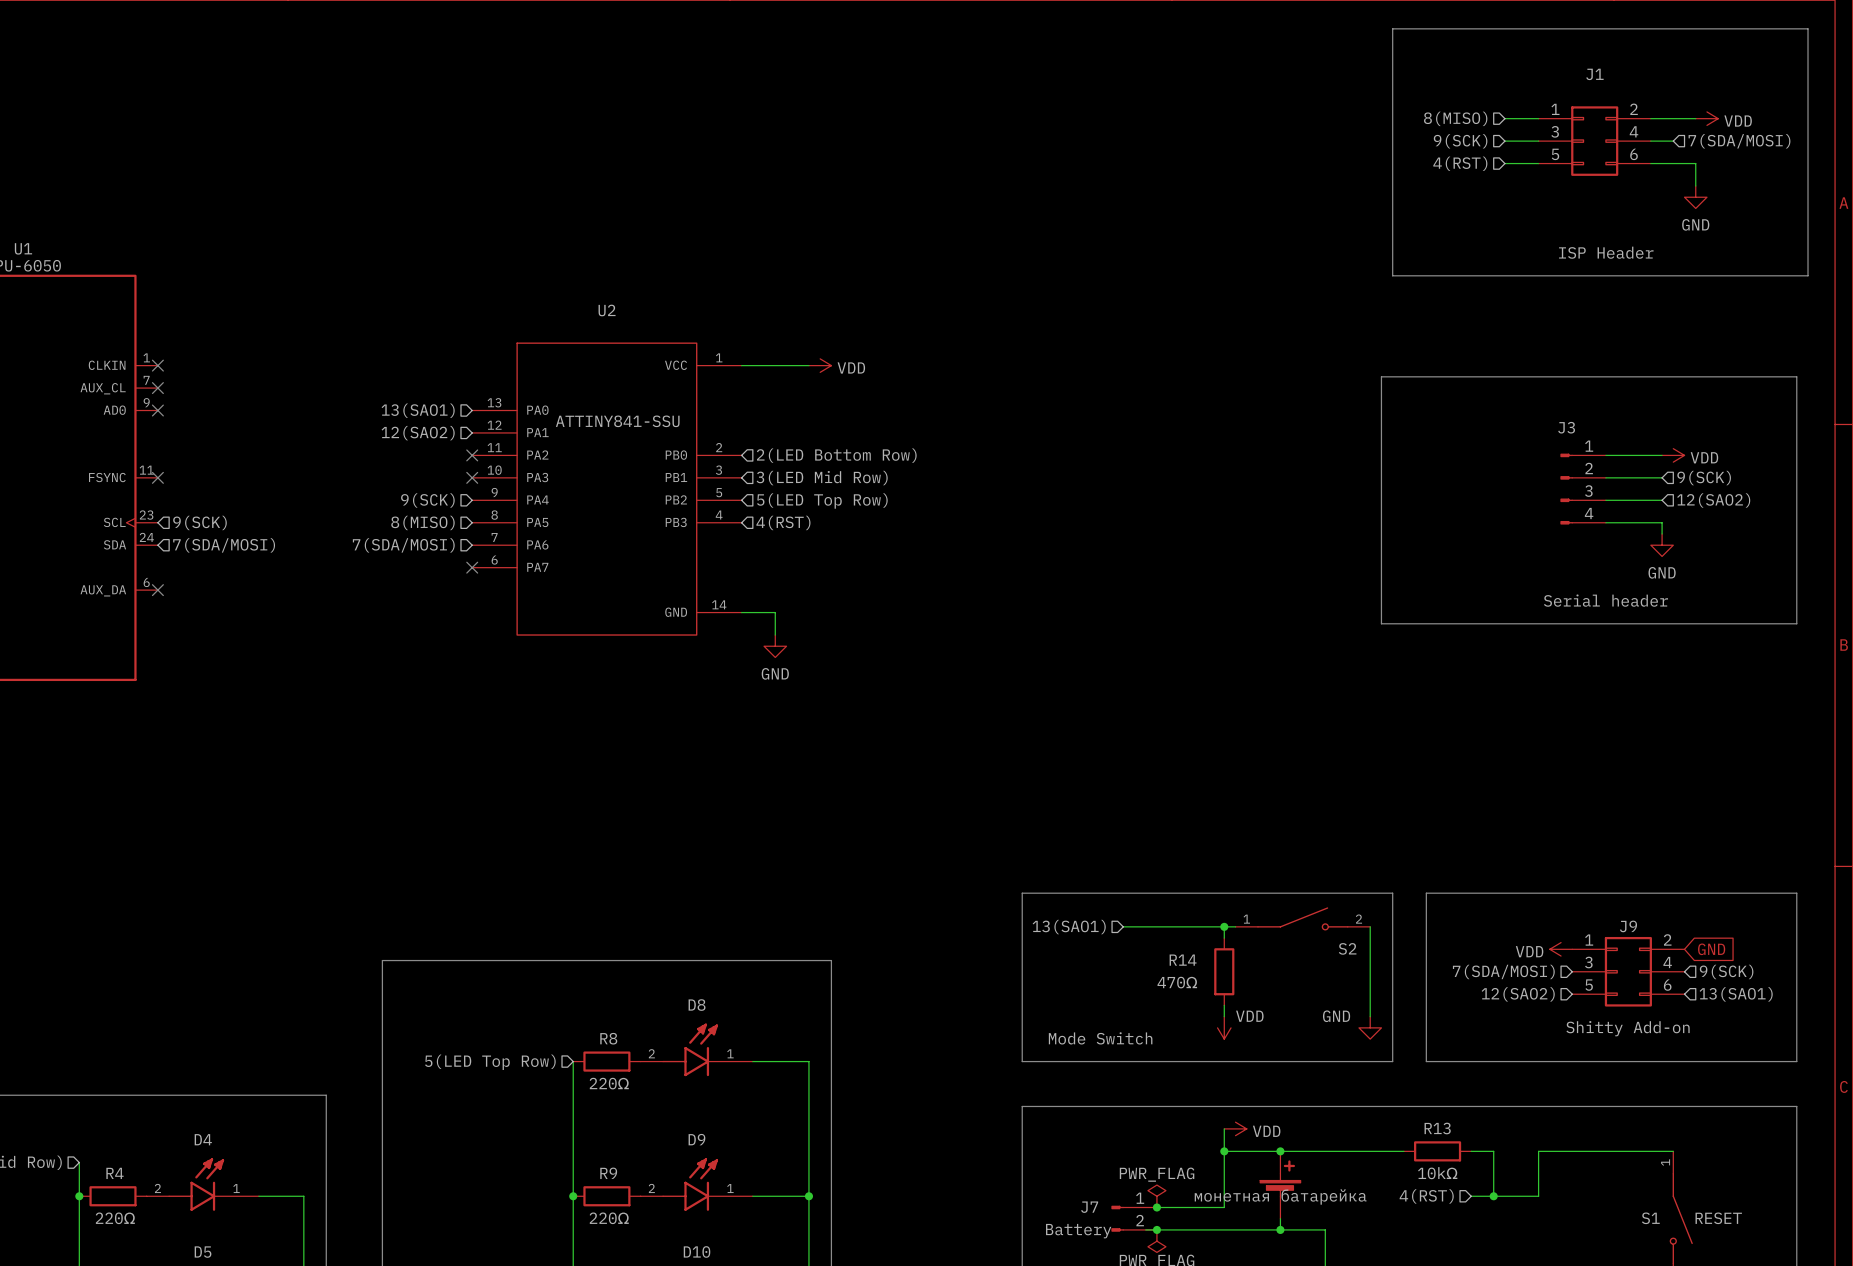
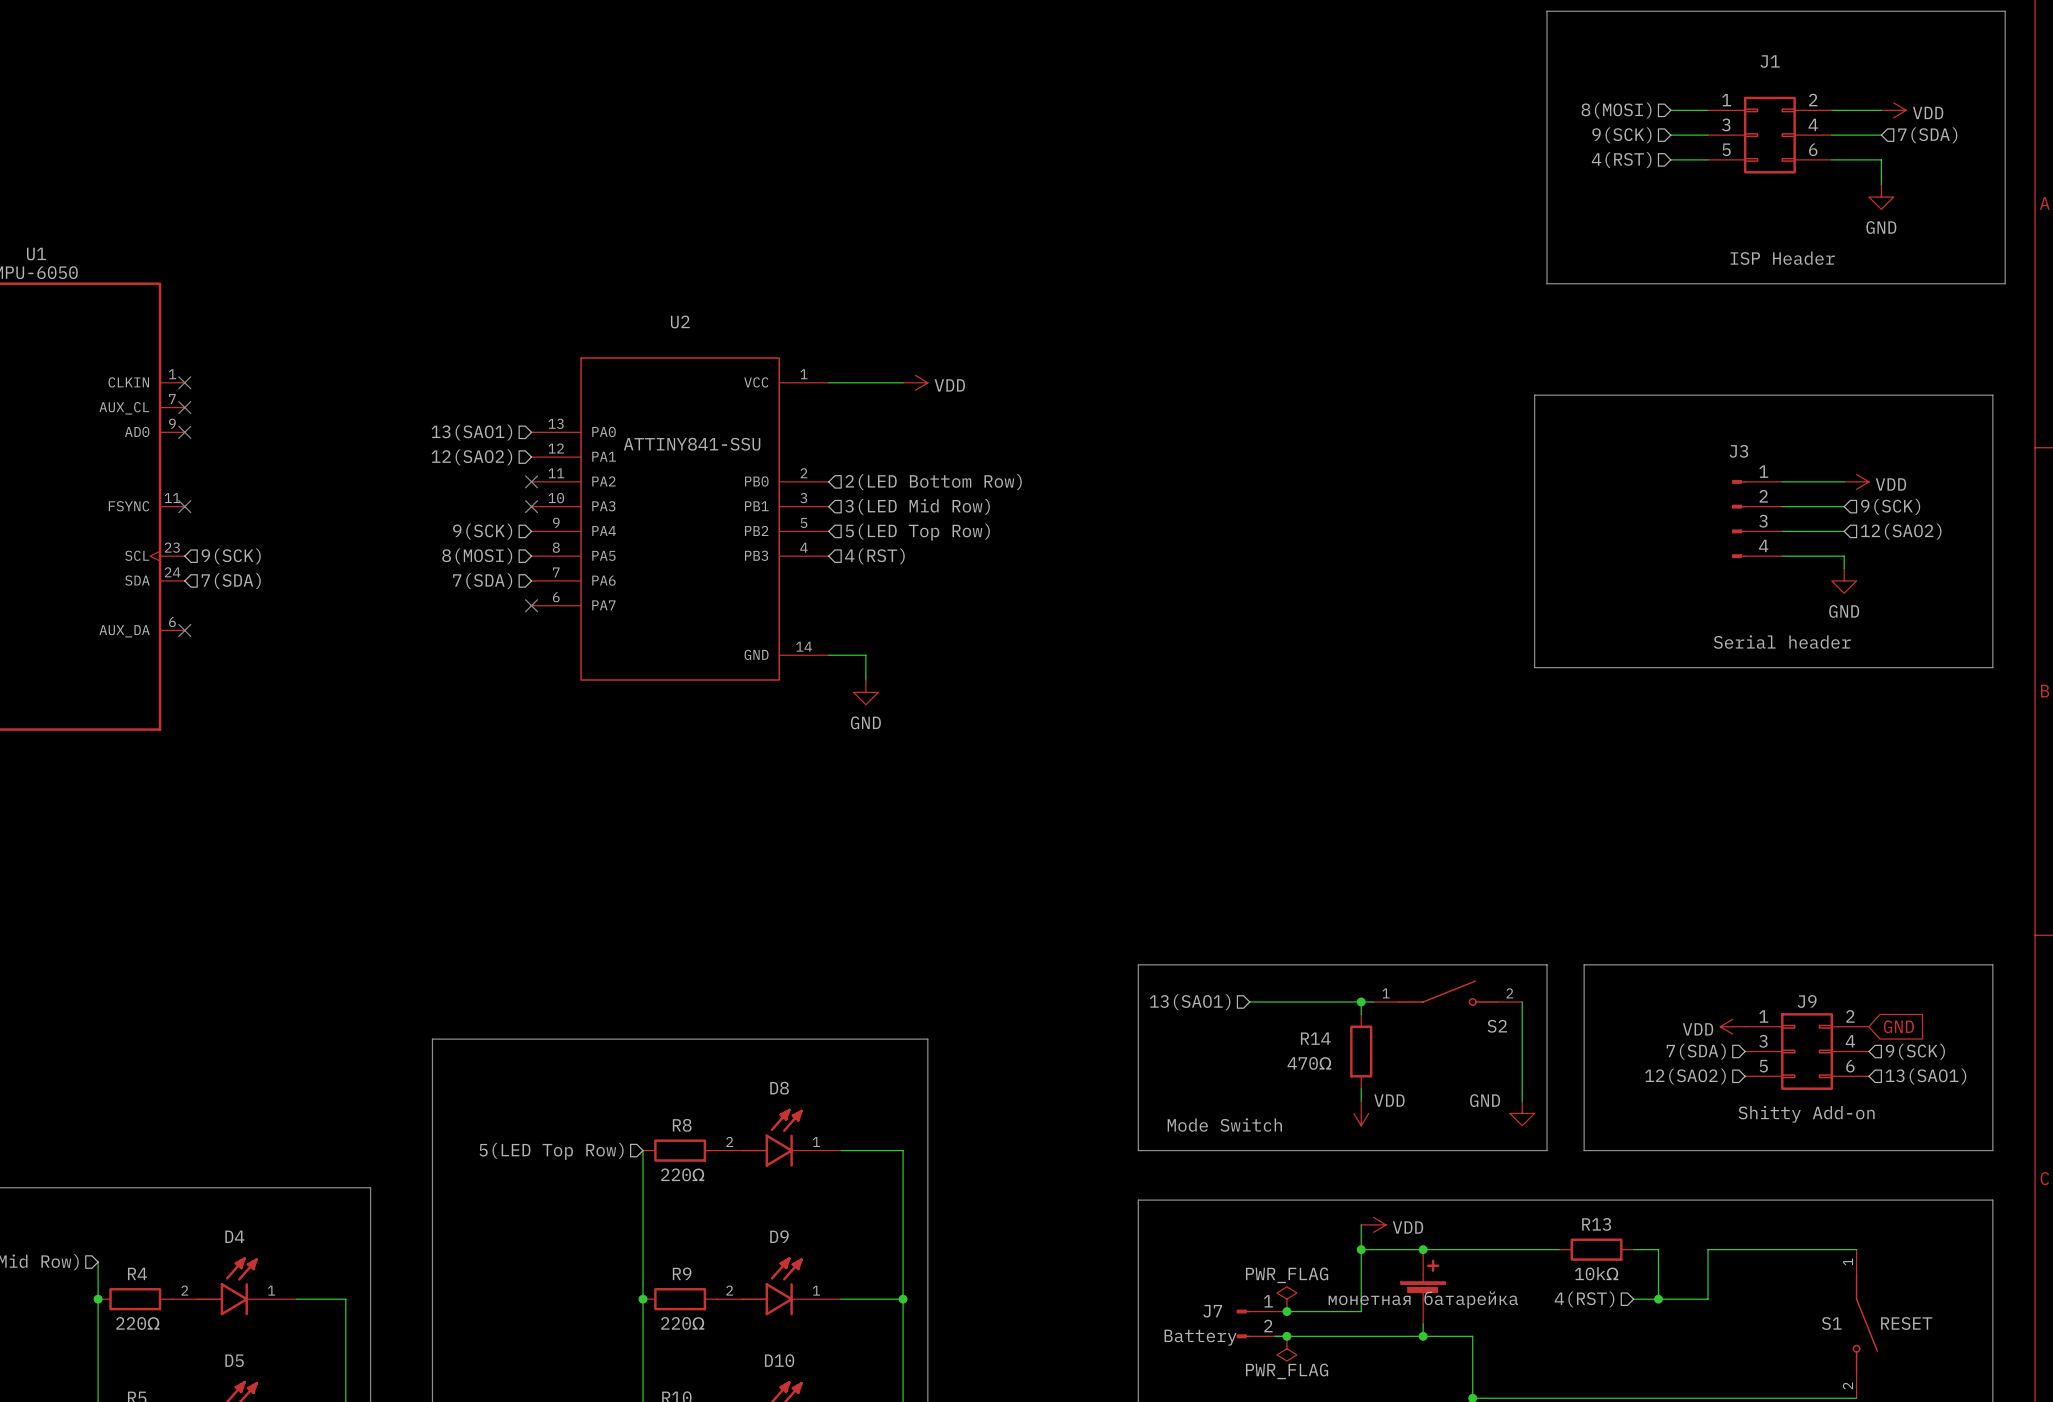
hierarchical label: 8(MISO) (1455, 118) -> 8(MOSI) (1616, 110)
wire: none -> (1856, 135) (1881, 135)
hierarchical label: 7(SDA/MOSI) (1739, 141) -> 7(SDA) (1927, 135)
hierarchical label: 8(MISO) (422, 522) -> 8(MOSI) (477, 556)
hierarchical label: 7(SDA/MOSI) (224, 545) -> 7(SDA) (231, 581)
hierarchical label: 7(SDA/MOSI) (403, 545) -> 7(SDA) (482, 581)
hierarchical label: 7(SDA/MOSI) (1503, 971) -> 7(SDA) (1696, 1051)

